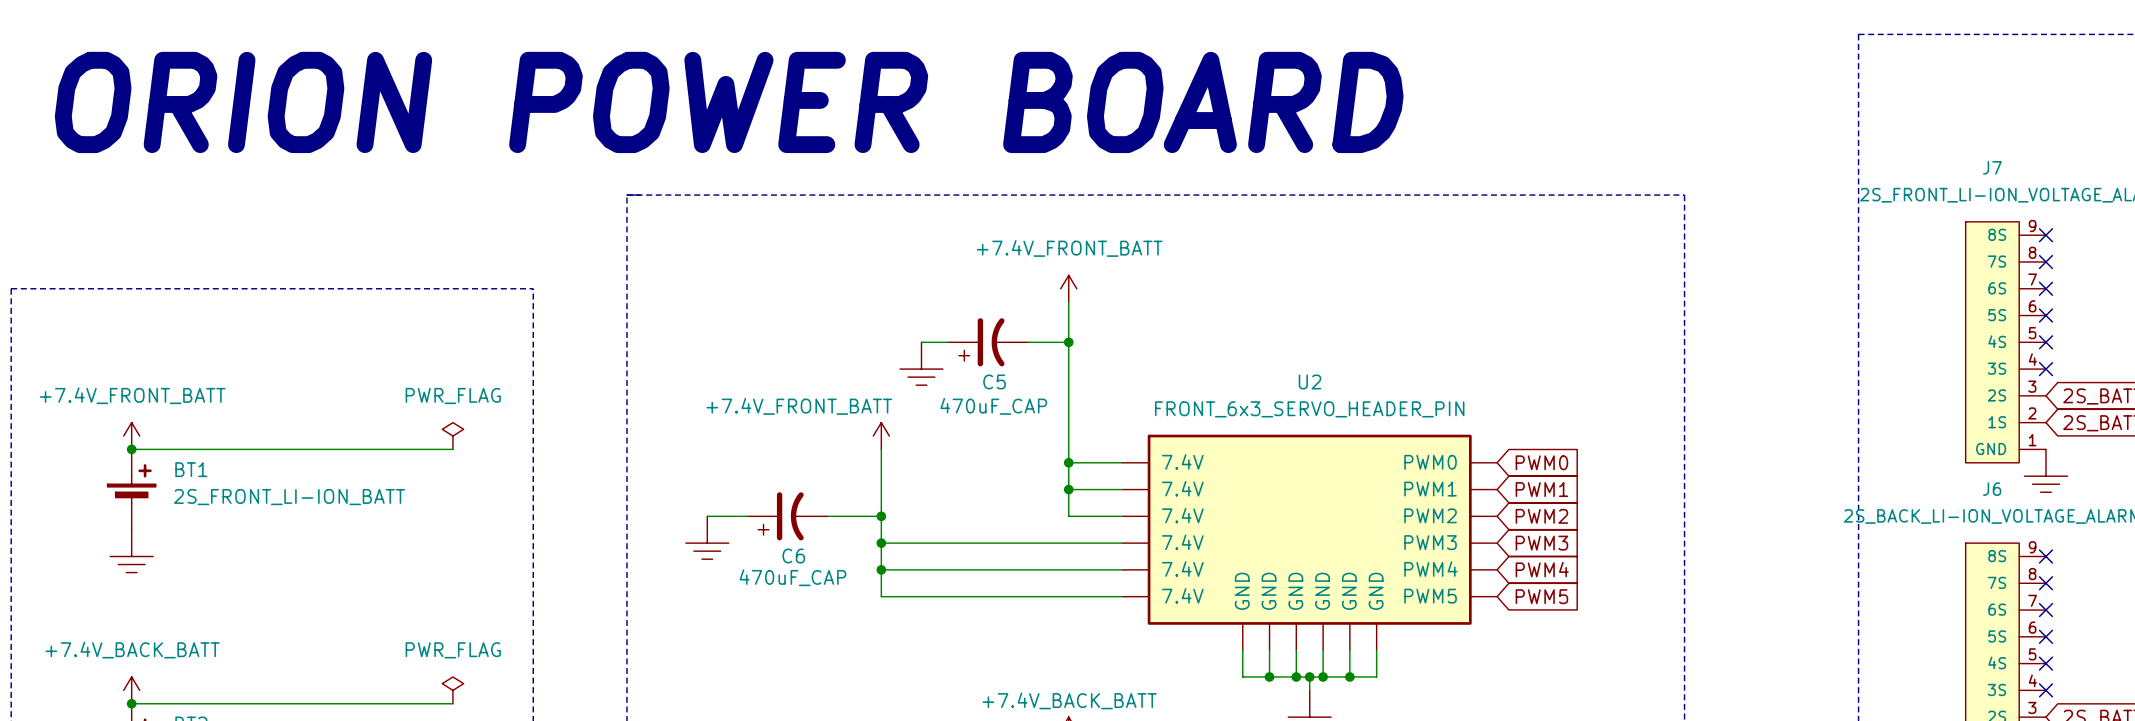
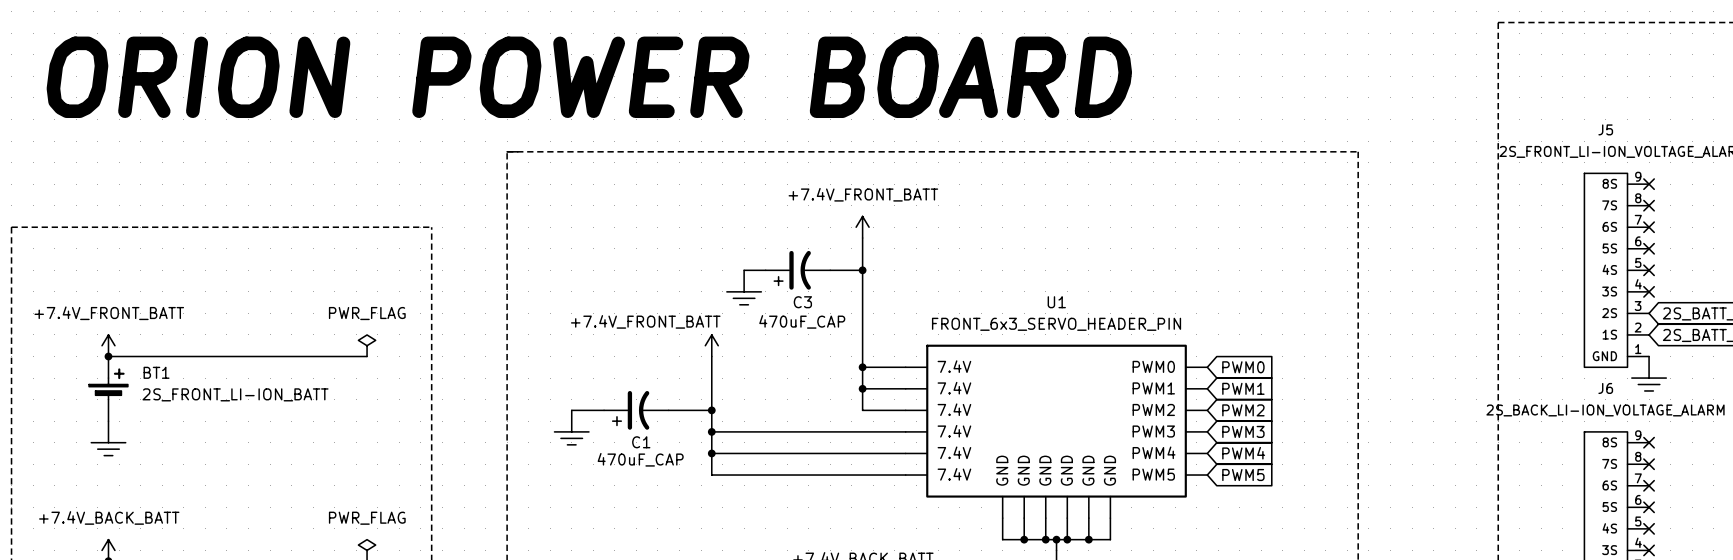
J7 name: J7 (1992, 167) -> J5 (1605, 129)
C5 name: C5 (994, 381) -> C3 (802, 302)
U2 name: U2 (1310, 381) -> U1 (1056, 302)
C6 name: C6 (793, 556) -> C1 (641, 442)

